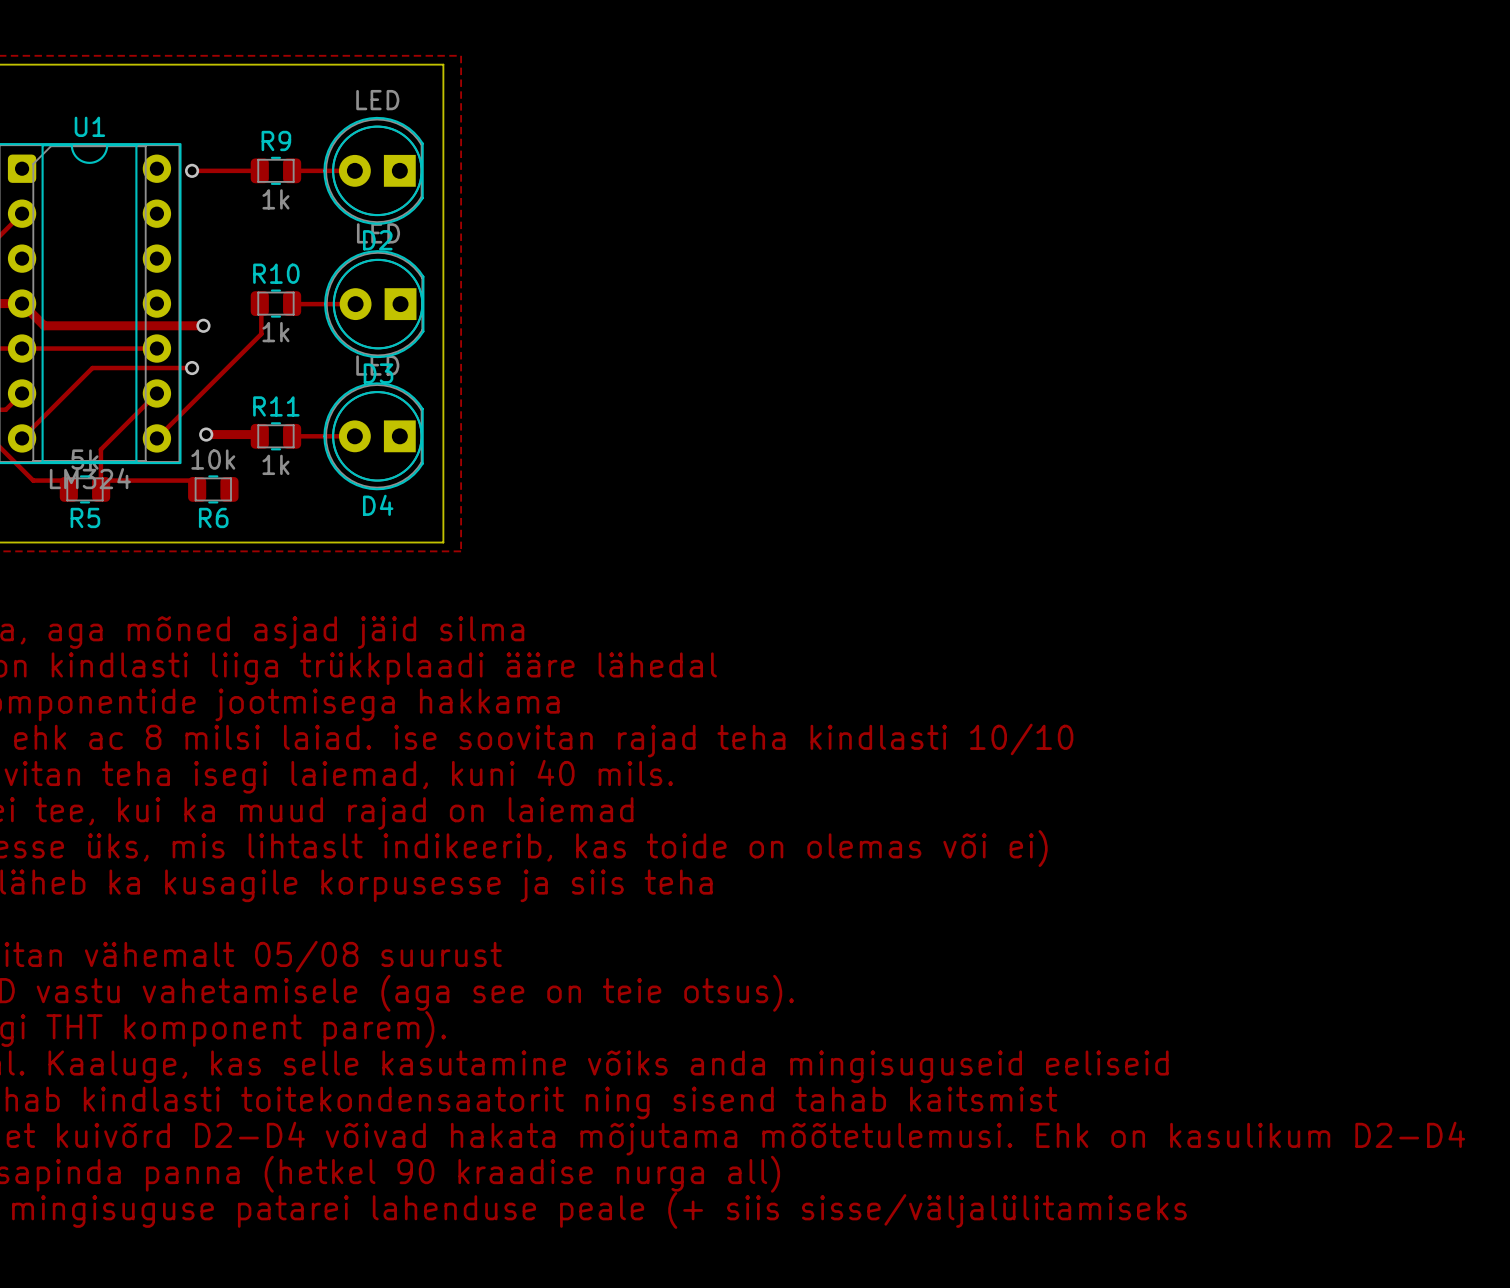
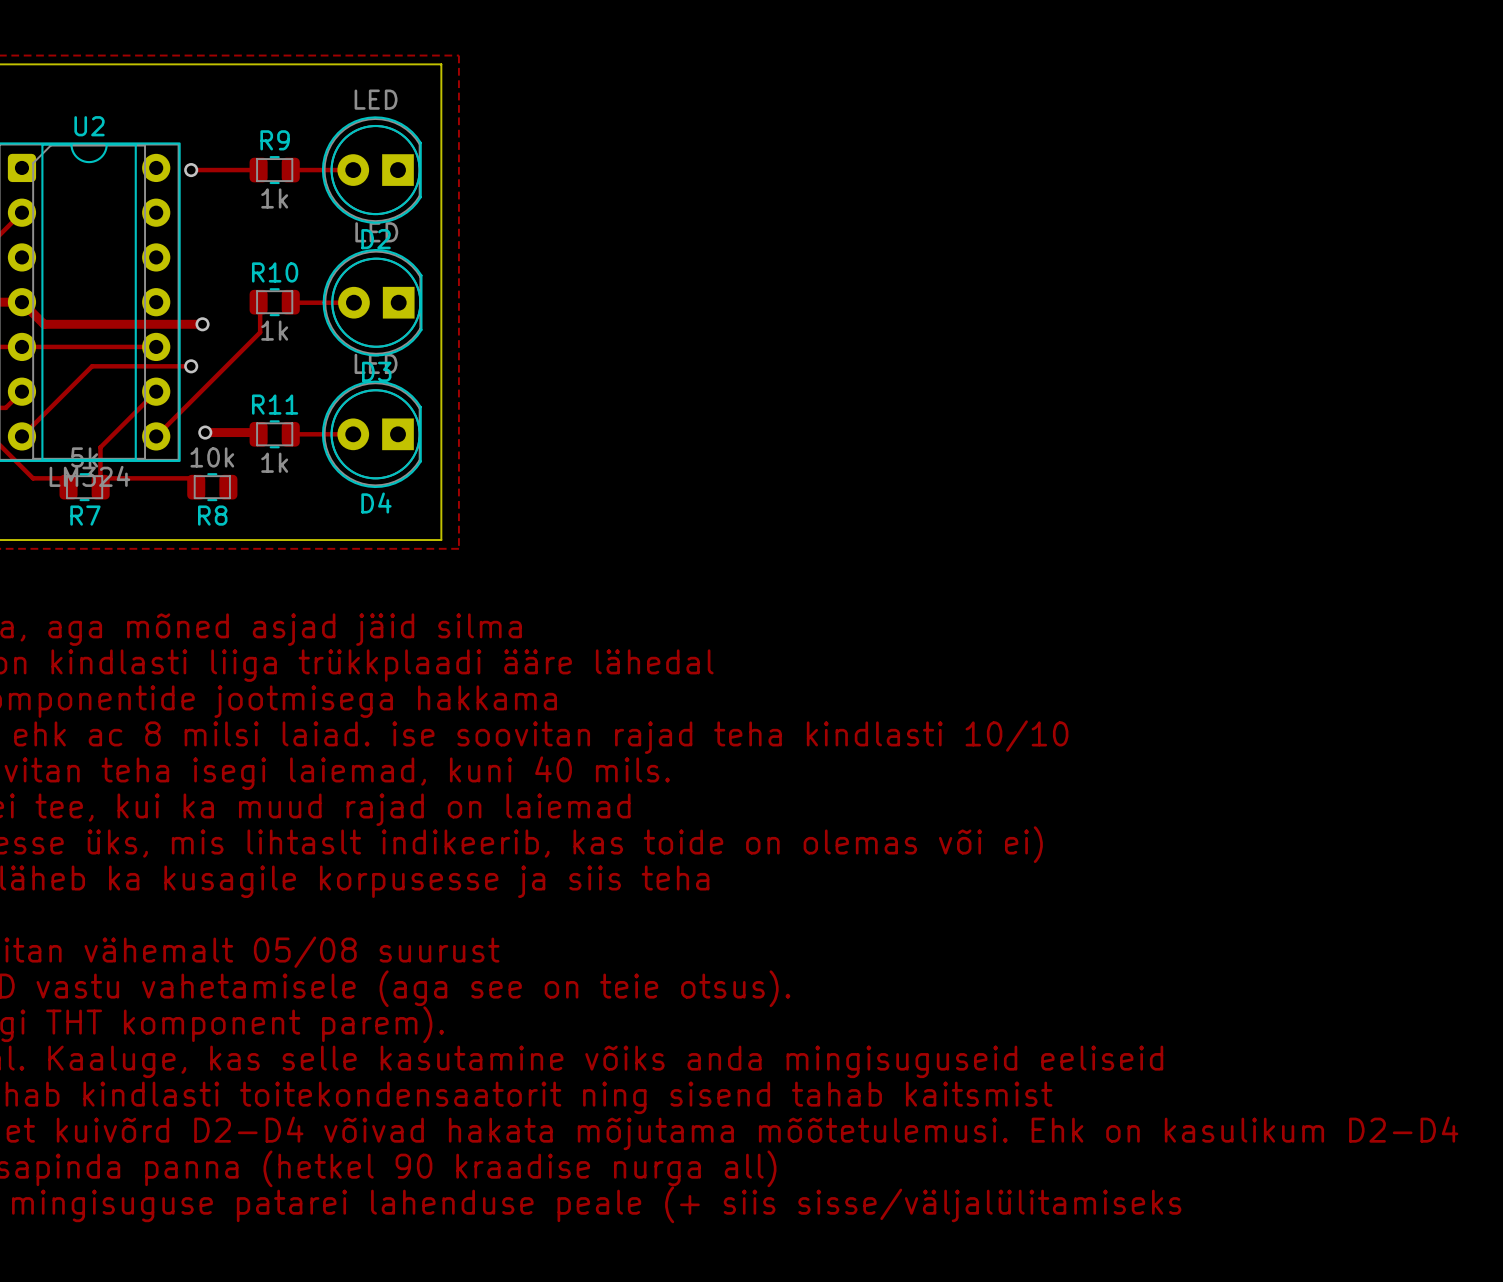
U1 name: U1 (89, 126) -> U2 (89, 126)
R5 name: R5 (85, 517) -> R7 (85, 515)
R6 name: R6 (213, 517) -> R8 (212, 515)

